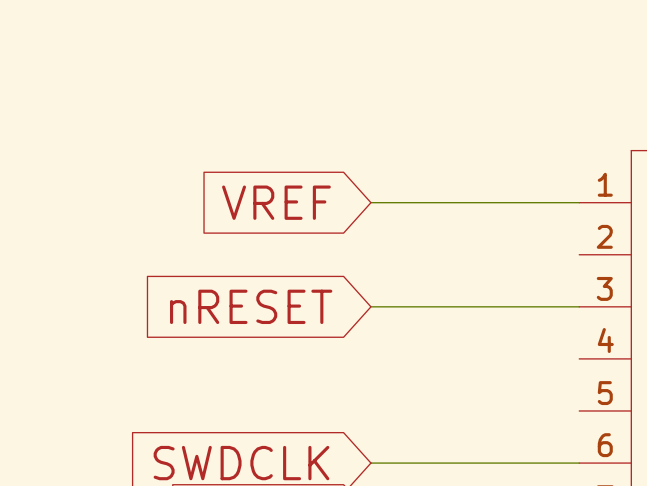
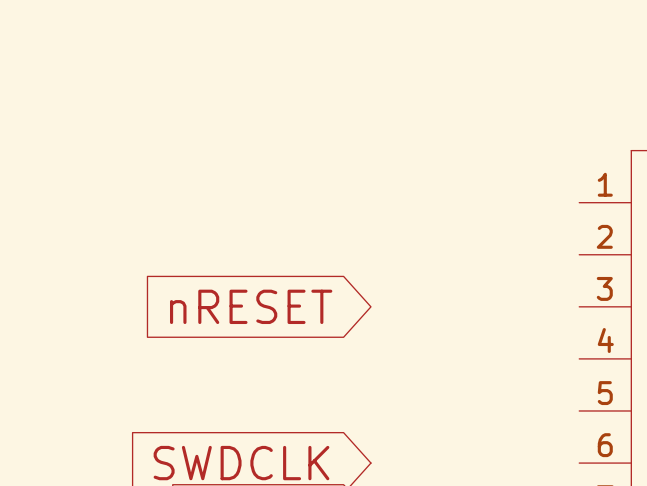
global label: VREF (276, 202) -> none
wire: (370, 202) (579, 202) -> none
wire: (370, 306) (579, 306) -> none
wire: (370, 463) (579, 463) -> none

